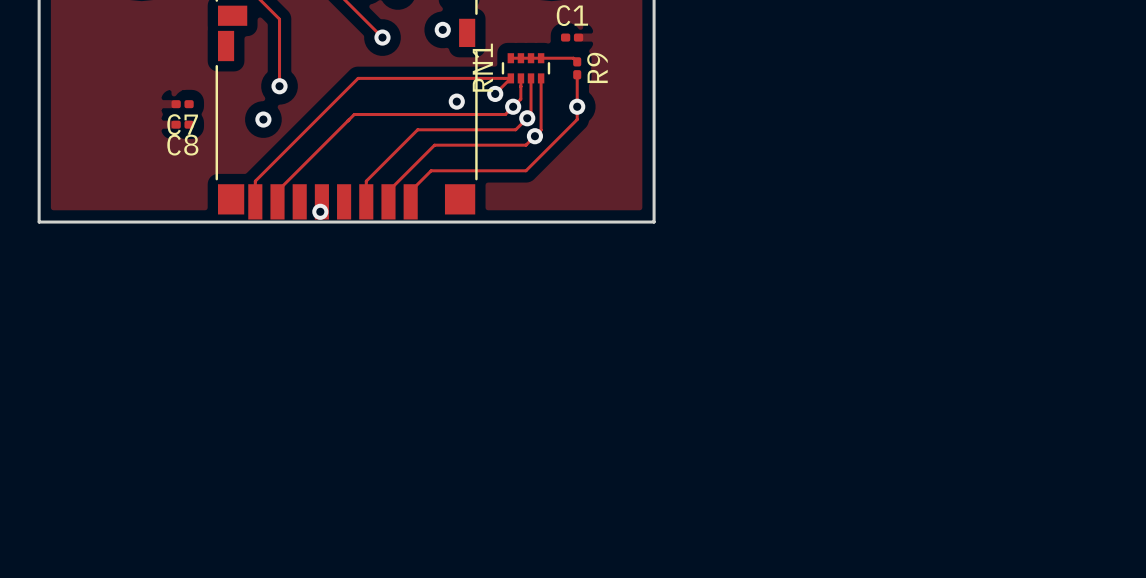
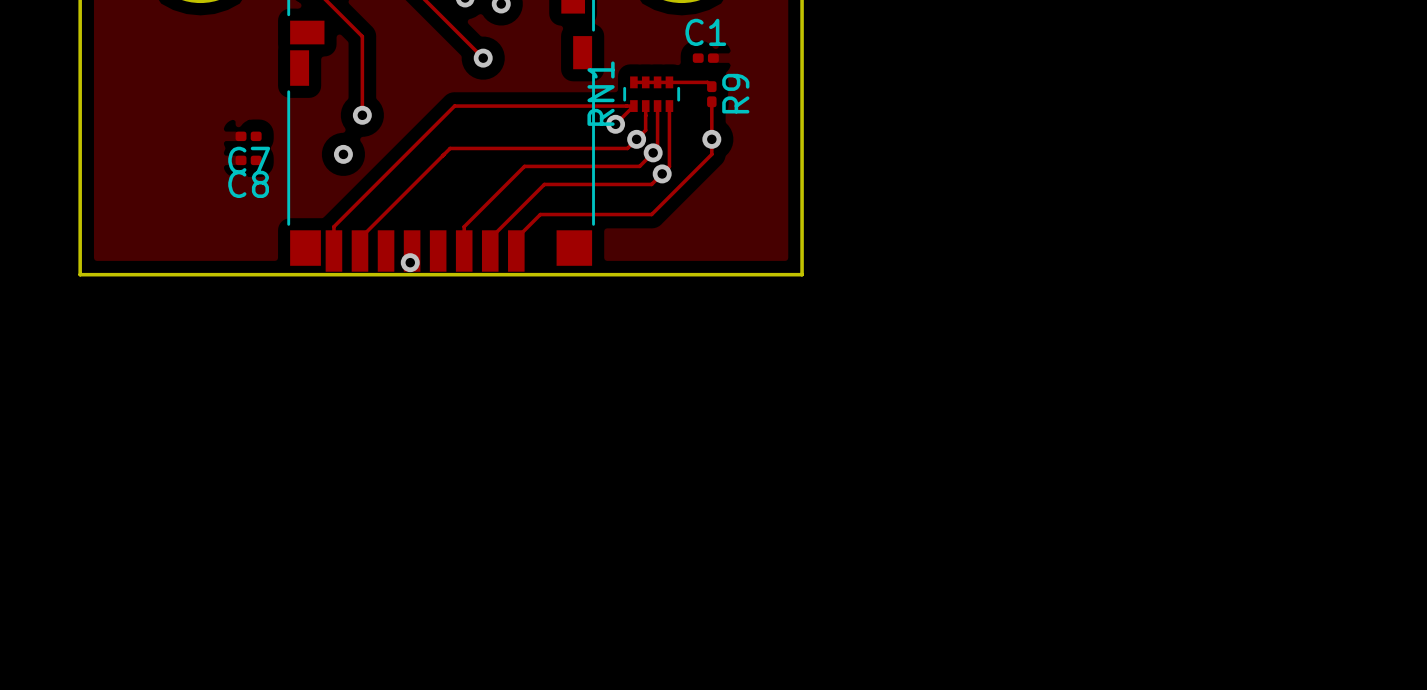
via: (442, 29) -> none
via: (456, 101) -> none

